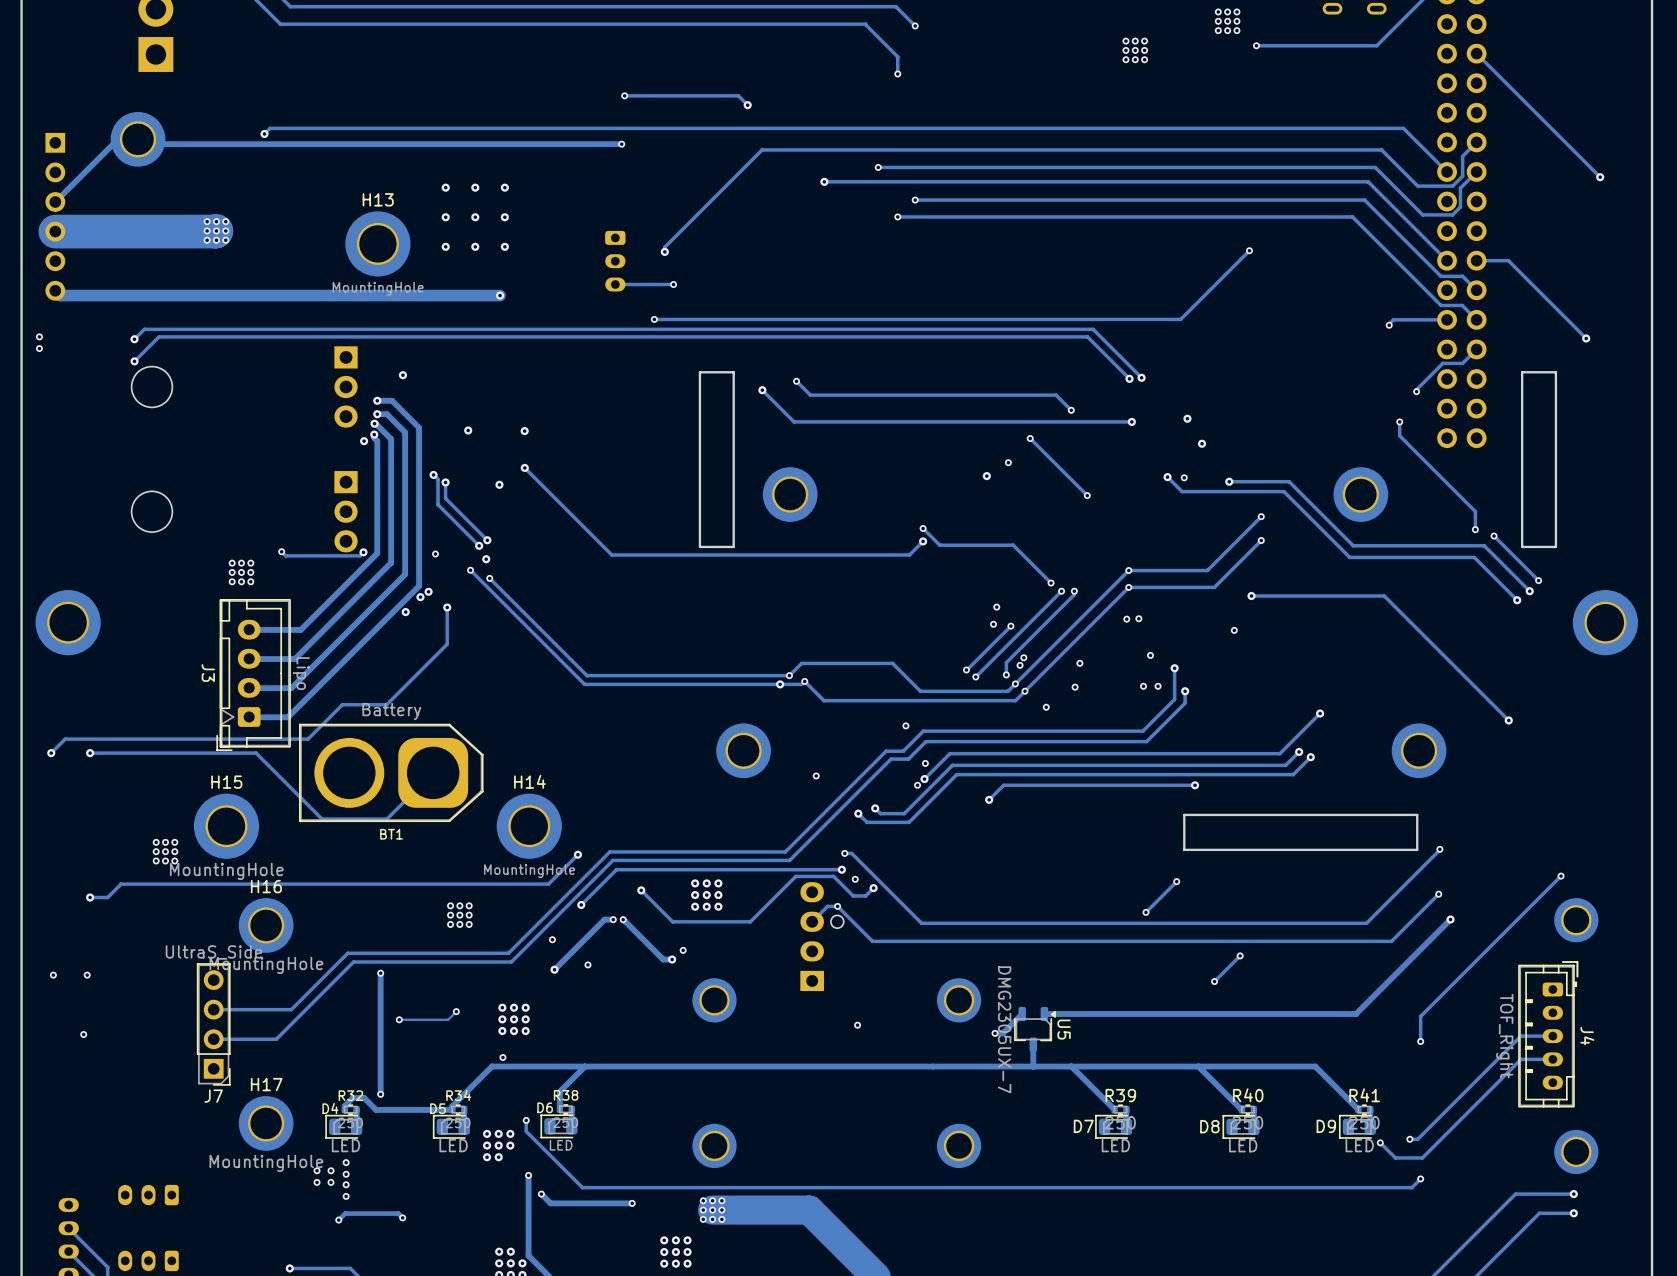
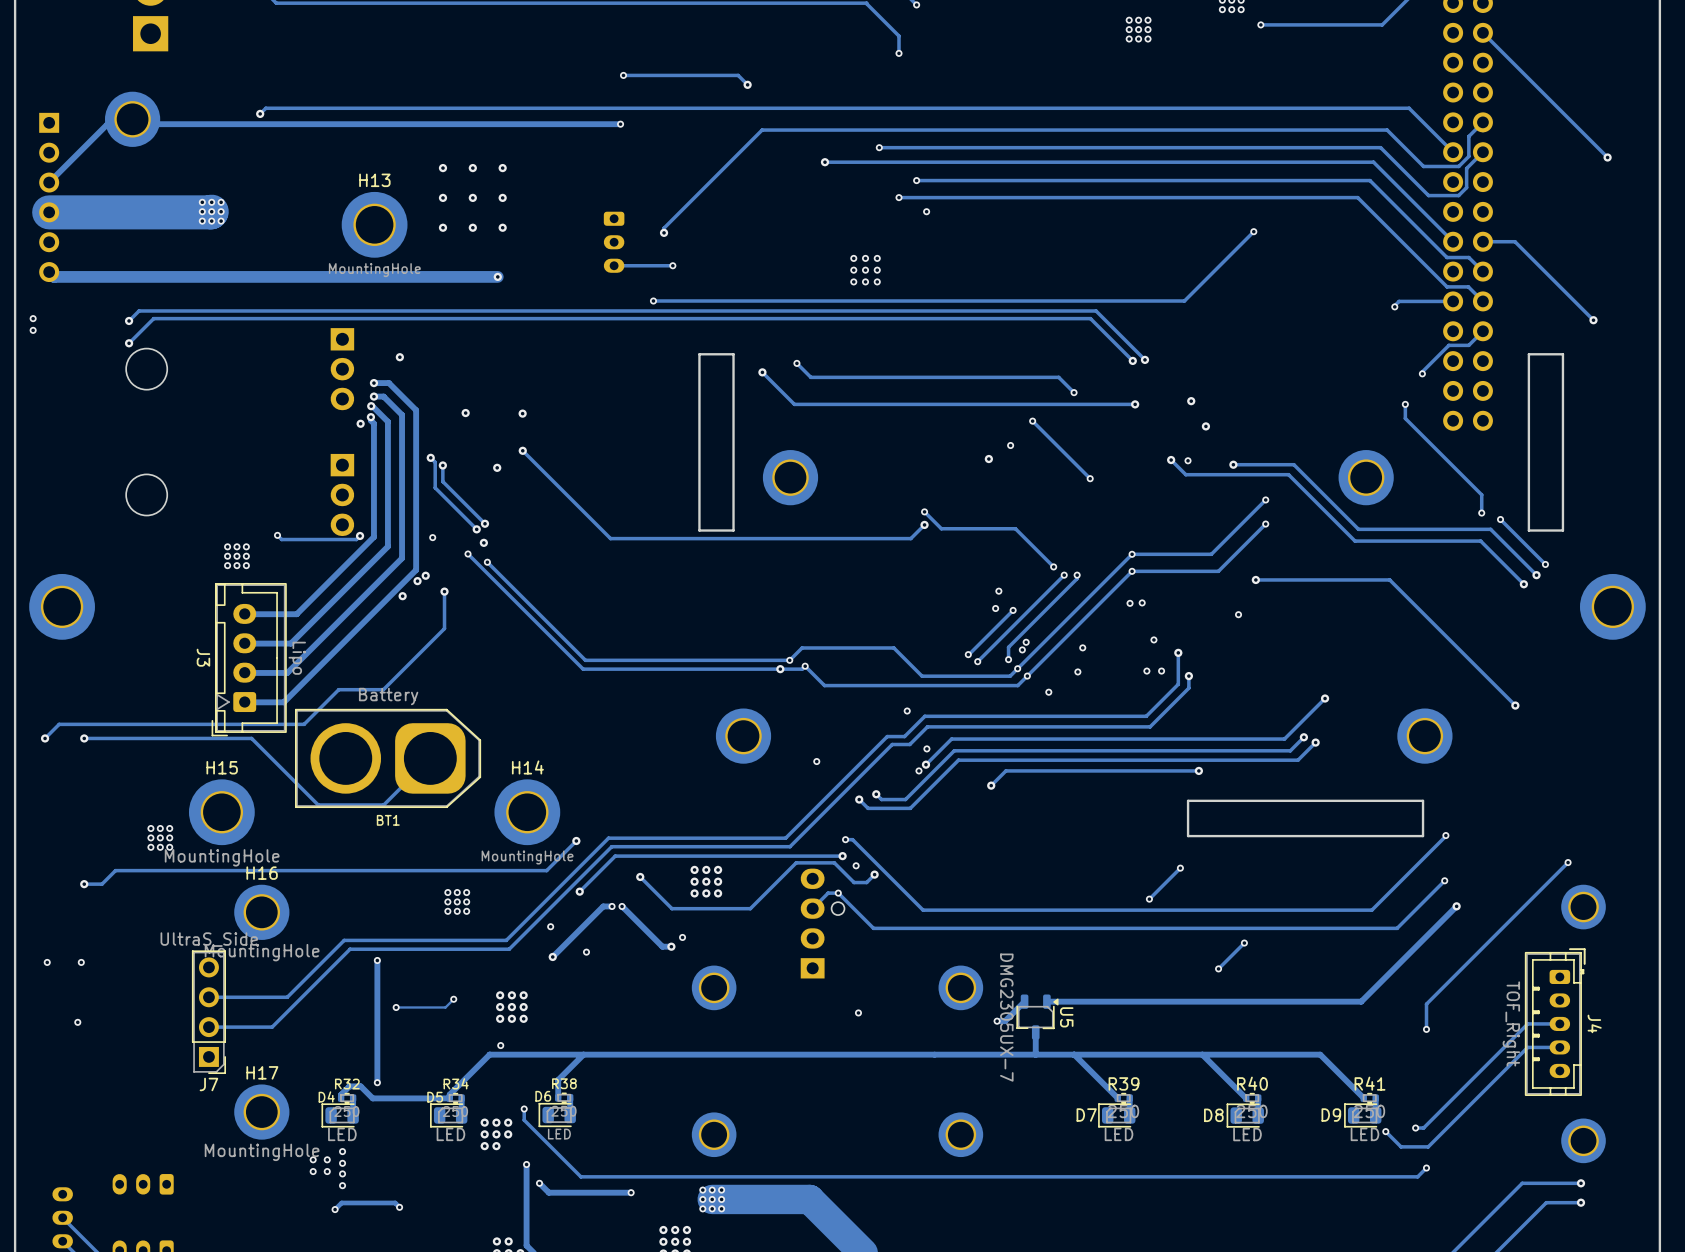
via: none -> (926, 211)
via: none -> (853, 258)
via: none -> (865, 258)
via: none -> (877, 258)
via: none -> (853, 270)
via: none -> (865, 270)
via: none -> (877, 270)
via: none -> (853, 281)
via: none -> (865, 281)
via: none -> (877, 281)

